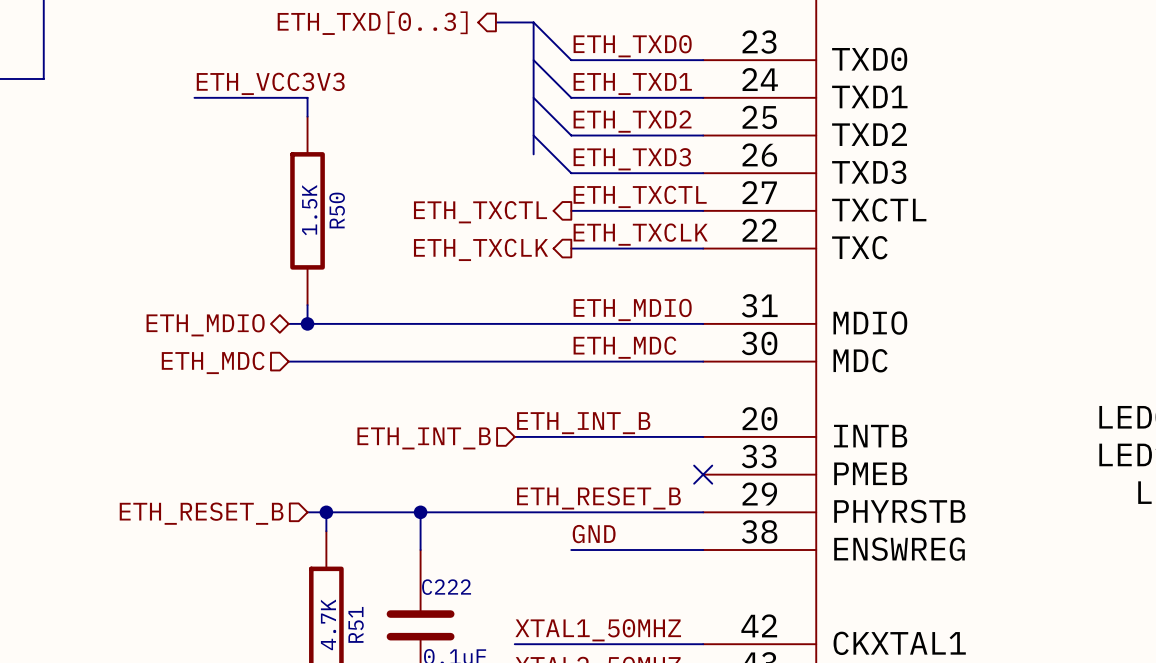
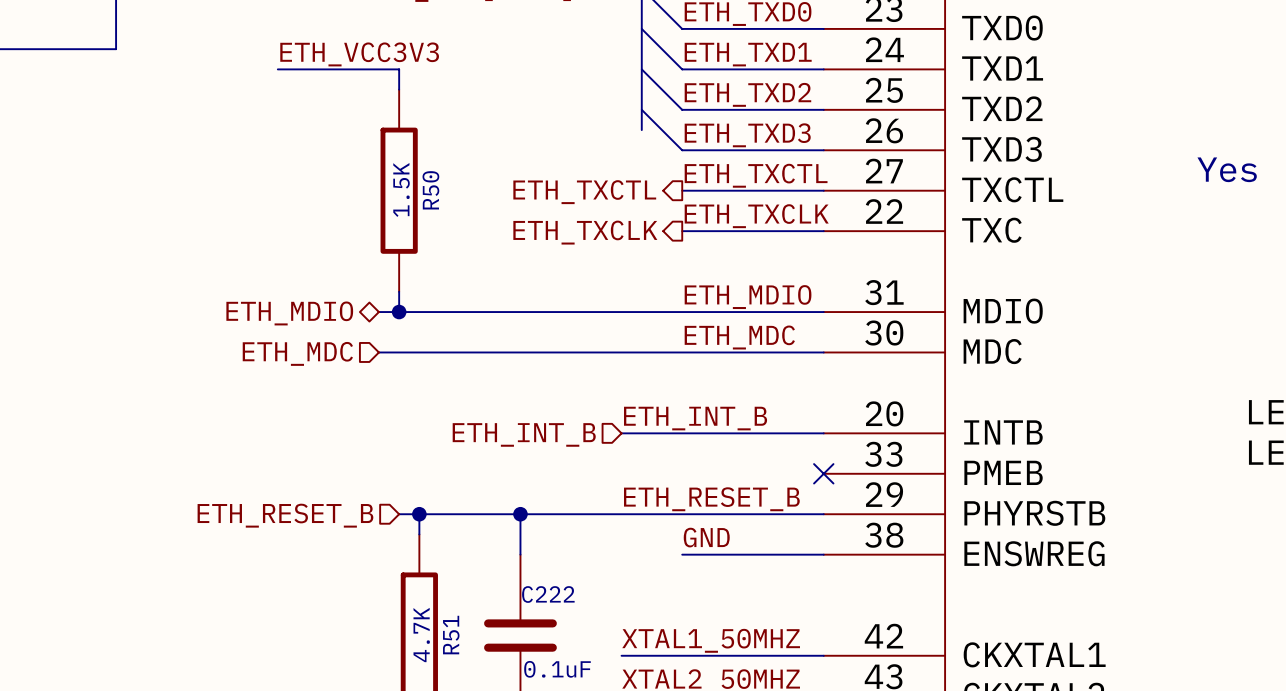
part text: none -> Yes (1227, 169)

